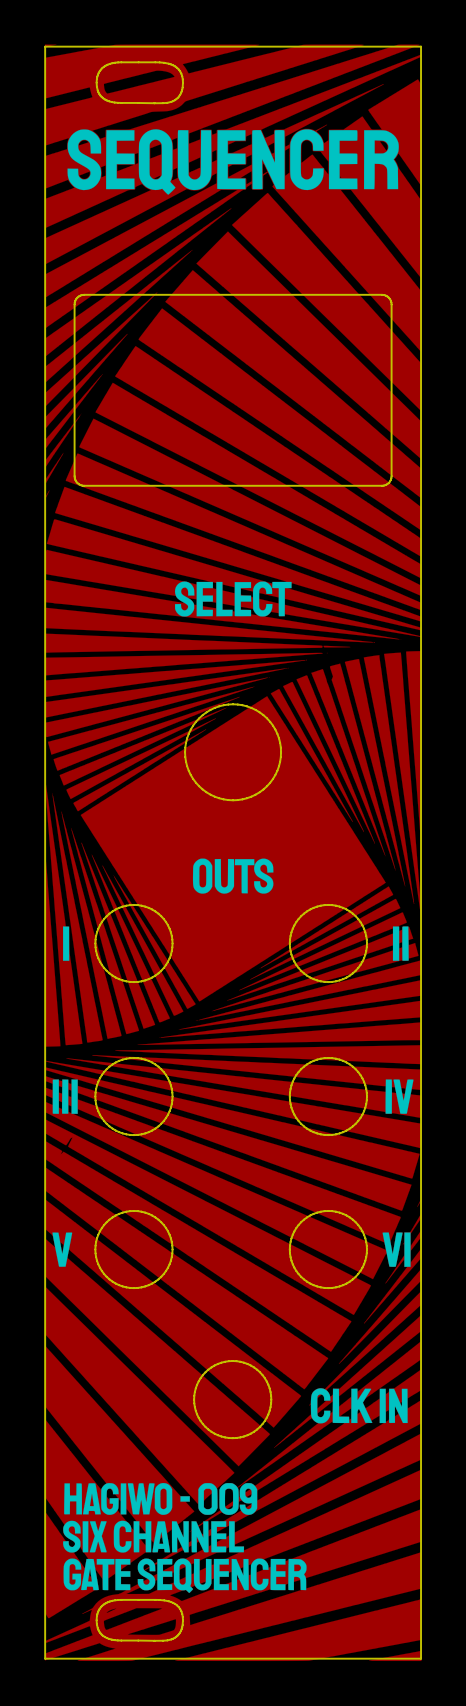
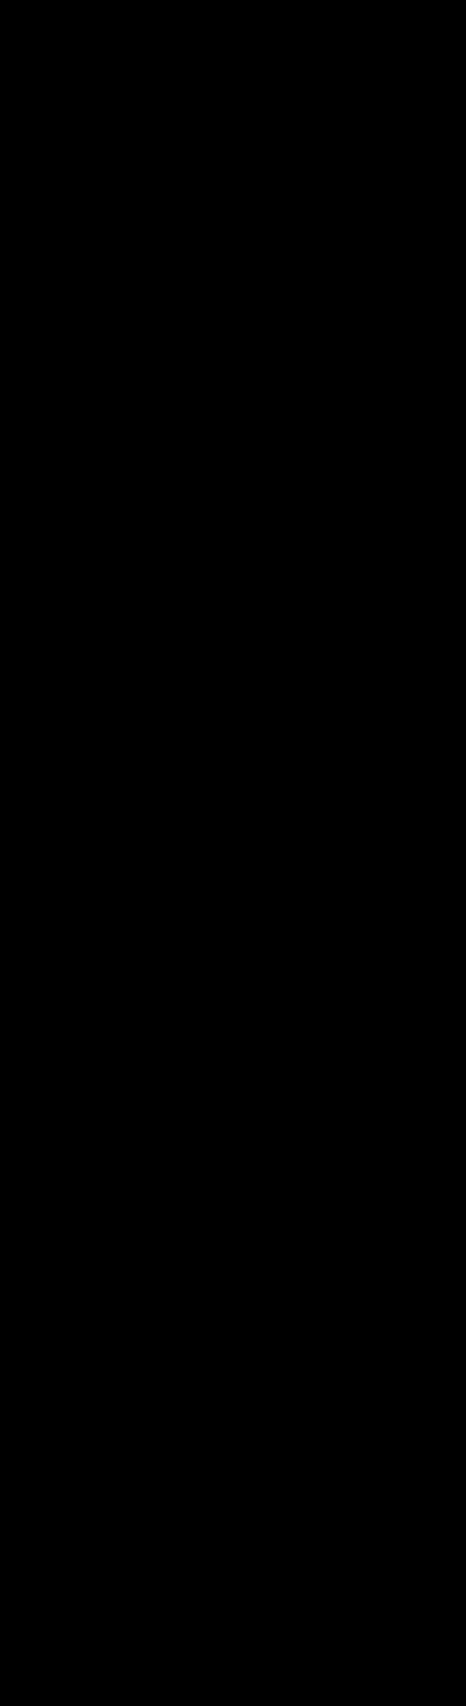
drawing: [44, 44, 422, 1662] -> none
board edge: (45, 46) (421, 46) (421, 1658) (45, 1658) (45, 46) -> none
board edge: (154, 103) (117, 102) (104, 99) (97, 90) (96, 82) (98, 72) (105, 65) (115, 62) (159, 62) (173, 65) (178, 69) (182, 76) (180, 93) (171, 101) (154, 103) -> none
board edge: (84, 294) (381, 294) (387, 296) (391, 304) (391, 476) (389, 481) (381, 485) (84, 485) (78, 484) (74, 476) (74, 304) (77, 297) (84, 294) -> none
board edge: (233, 704) (214, 707) (199, 718) (188, 733) (185, 752) (188, 770) (199, 786) (214, 796) (233, 800) (251, 796) (267, 786) (277, 770) (281, 752) (277, 733) (267, 718) (251, 707) (233, 704) -> none
board edge: (133, 904) (119, 907) (106, 916) (98, 928) (95, 943) (98, 958) (106, 970) (119, 979) (133, 982) (148, 979) (161, 970) (169, 958) (172, 943) (169, 928) (161, 916) (148, 907) (133, 904) -> none
board edge: (328, 904) (313, 907) (301, 916) (292, 928) (289, 943) (292, 958) (301, 970) (313, 979) (328, 982) (343, 979) (355, 970) (364, 958) (366, 943) (364, 928) (355, 916) (343, 907) (328, 904) -> none
board edge: (133, 1057) (119, 1060) (106, 1069) (98, 1081) (95, 1096) (98, 1111) (106, 1123) (119, 1132) (133, 1135) (148, 1132) (161, 1123) (169, 1111) (172, 1096) (169, 1081) (161, 1069) (148, 1060) (133, 1057) -> none
board edge: (328, 1057) (313, 1060) (301, 1069) (292, 1081) (289, 1096) (292, 1111) (301, 1123) (313, 1132) (328, 1135) (343, 1132) (355, 1123) (364, 1111) (366, 1096) (364, 1081) (355, 1069) (343, 1060) (328, 1057) -> none
board edge: (133, 1210) (119, 1213) (106, 1222) (98, 1234) (95, 1249) (98, 1264) (106, 1276) (119, 1285) (133, 1288) (148, 1285) (161, 1276) (169, 1264) (172, 1249) (169, 1234) (161, 1222) (148, 1213) (133, 1210) -> none
board edge: (328, 1210) (313, 1213) (301, 1222) (292, 1234) (289, 1249) (292, 1264) (301, 1276) (313, 1285) (328, 1288) (343, 1285) (355, 1276) (364, 1264) (366, 1249) (364, 1234) (355, 1222) (343, 1213) (328, 1210) -> none
board edge: (232, 1360) (217, 1363) (205, 1372) (197, 1384) (194, 1399) (197, 1414) (205, 1426) (217, 1435) (232, 1438) (247, 1435) (260, 1426) (268, 1414) (271, 1399) (268, 1384) (260, 1372) (247, 1363) (232, 1360) -> none
board edge: (154, 1640) (117, 1640) (104, 1637) (97, 1628) (96, 1620) (98, 1610) (105, 1603) (115, 1600) (159, 1599) (173, 1602) (178, 1607) (182, 1613) (180, 1631) (171, 1639) (154, 1640) -> none

